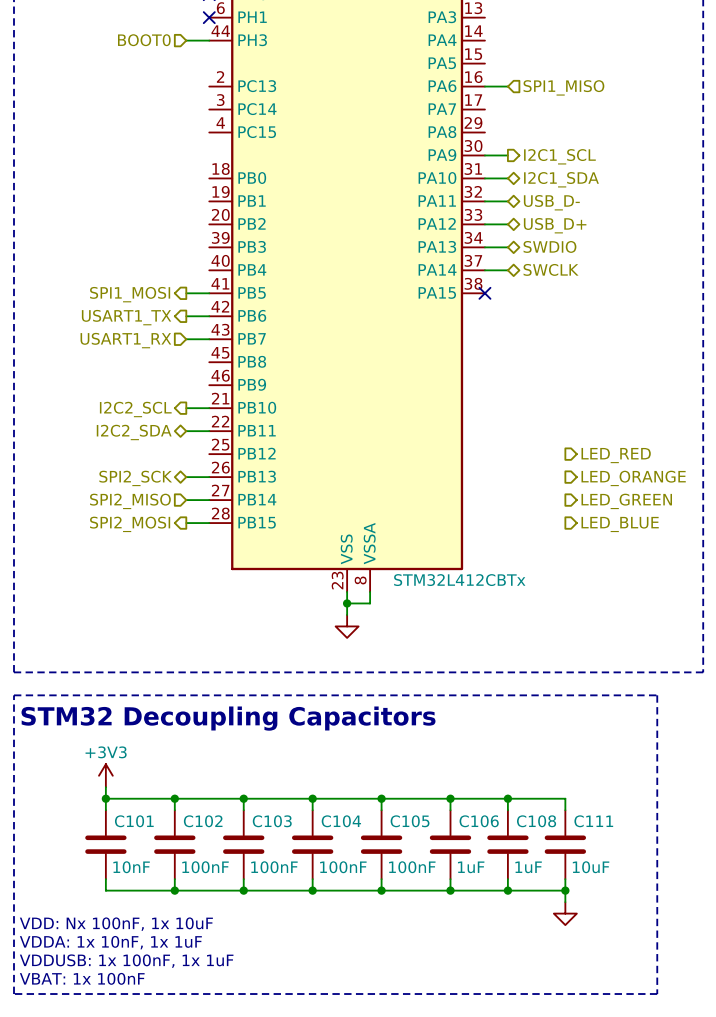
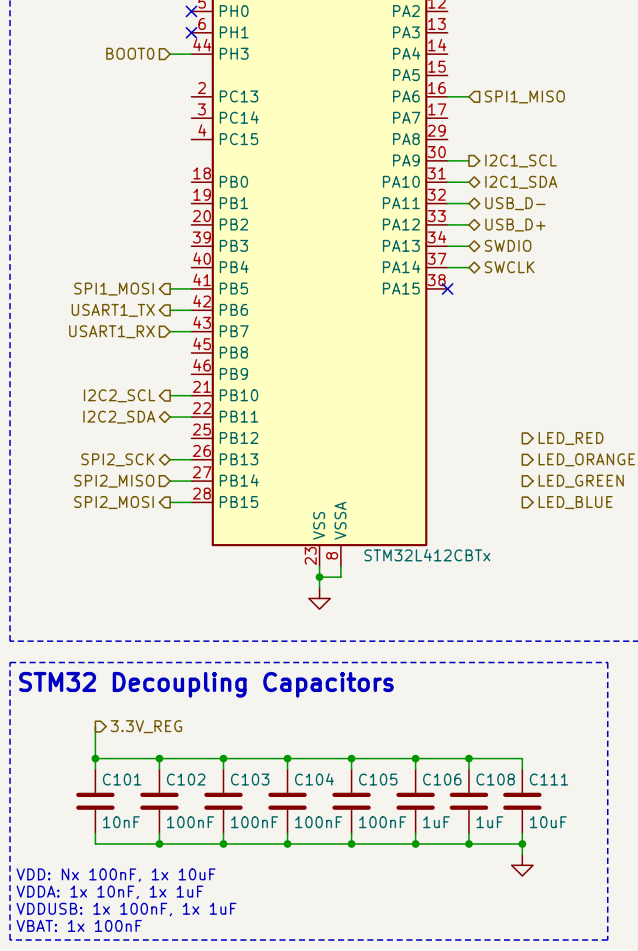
hierarchical label: none -> 3.3V_REG (146, 726)
power symbol: +3V3 (105, 775) -> none

